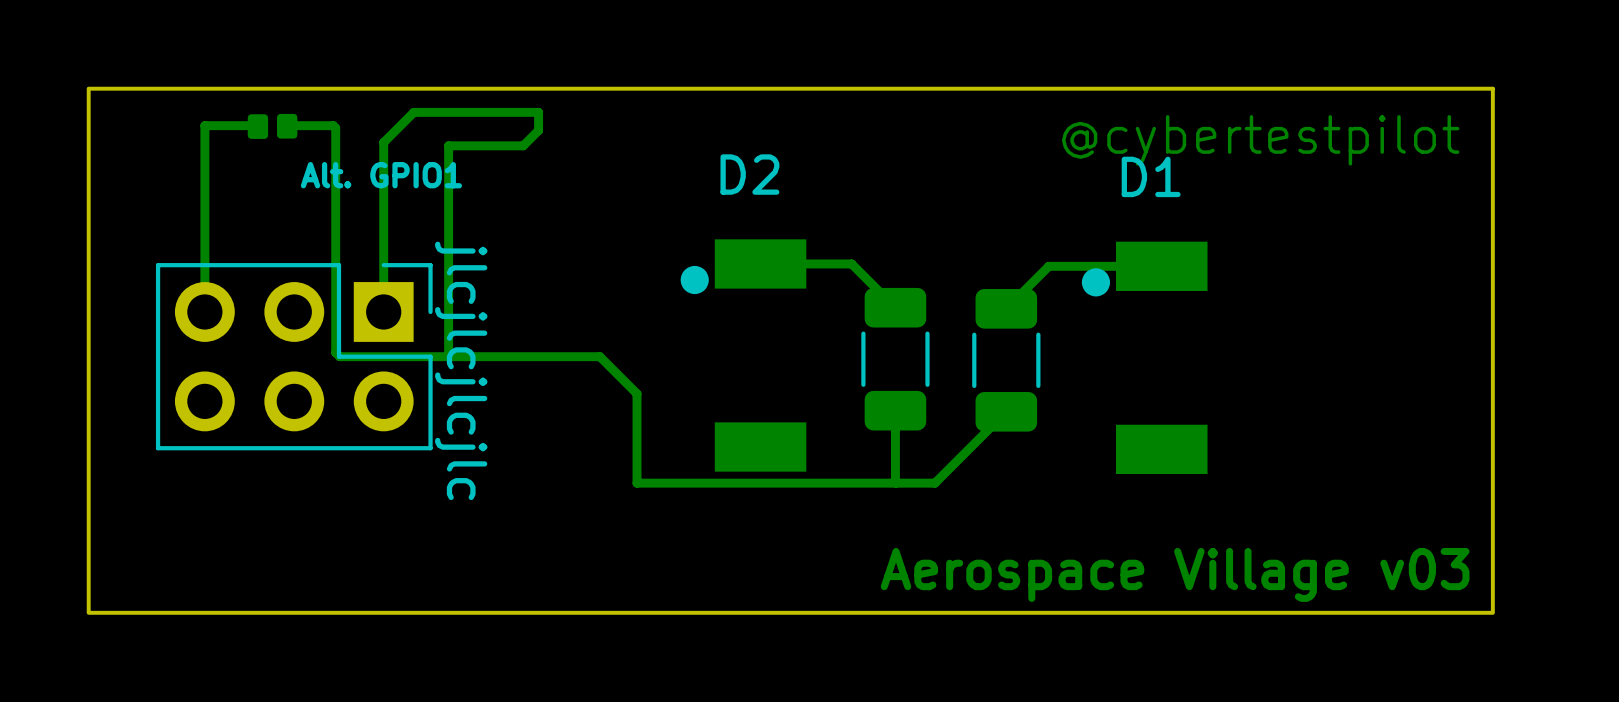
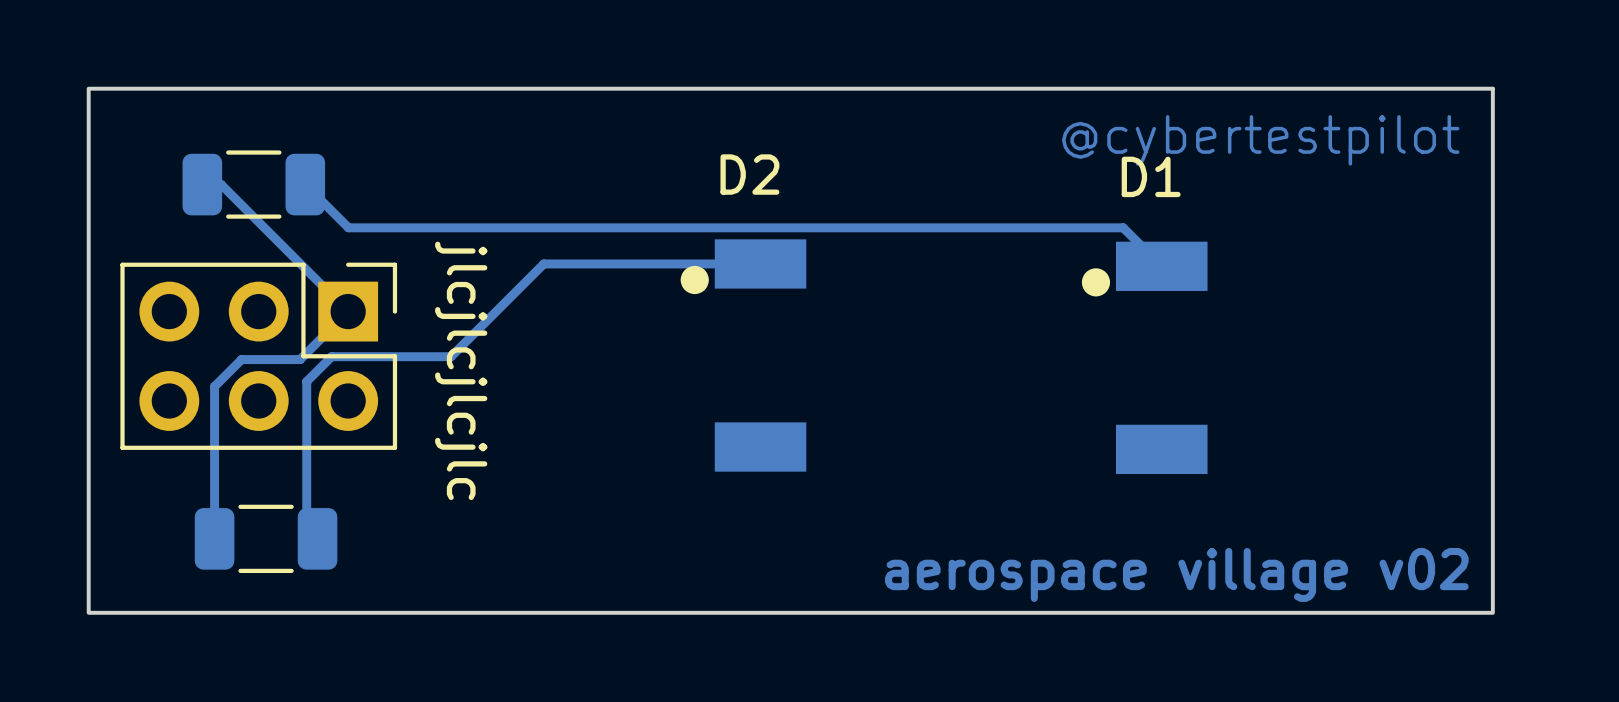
track: (538, 112) (538, 130) (523, 145) (448, 145) (448, 354) (450, 356) -> (760, 263) (543, 263) (451, 356)
track: (538, 112) (413, 112) (383, 142) (383, 311) -> none
drawing: [247, 113, 298, 139] -> none
track: (260, 125) (204, 125) (204, 311) -> none
track: (288, 125) (333, 125) (335, 128) (335, 352) (339, 356) -> (317, 538) (306, 528) (306, 381) (331, 356) (339, 356)
text: Alt. GPIO1 (381, 175) -> none
track: none -> (202, 184) (221, 184) (348, 311) (300, 359) (241, 359) (214, 386) (214, 538)
part: none -> (253, 184)
track: (760, 263) (851, 263) (895, 307) -> none
track: (1161, 266) (1048, 266) (1006, 308) -> (1161, 266) (1123, 227) (348, 227) (305, 184)
part position: (294, 356) -> (258, 356)
track: (451, 356) (599, 356) (637, 393) (637, 483) (934, 483) (1006, 411) -> none
part: (895, 359) -> none
part: (1006, 360) -> none
track: (895, 410) (895, 483) -> none
part: none -> (266, 538)
text: Aerospace Village v03 (1175, 574) -> aerospace village v02 (1176, 574)

